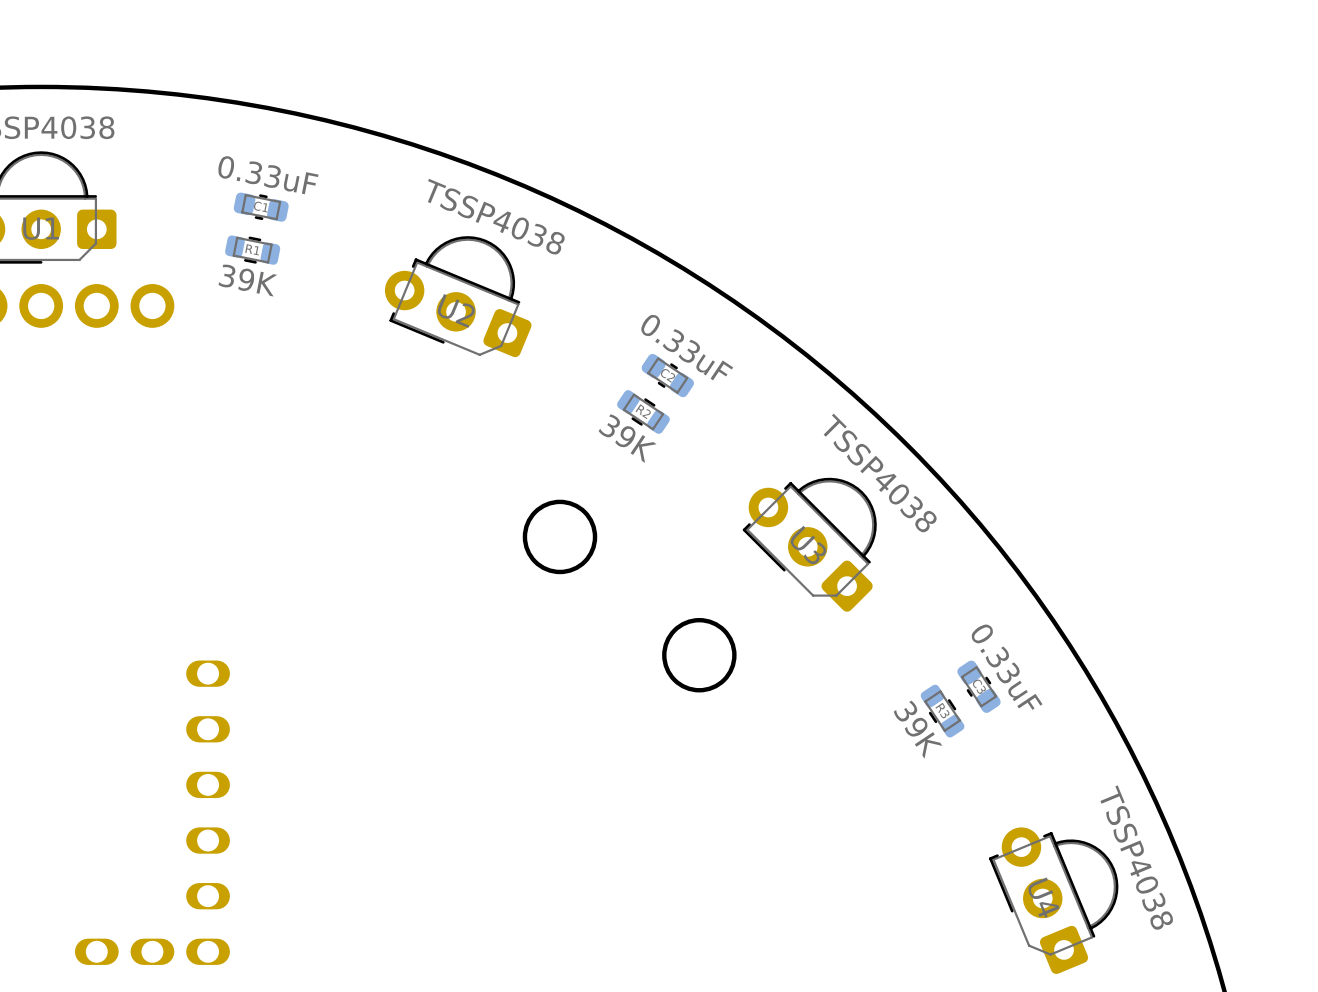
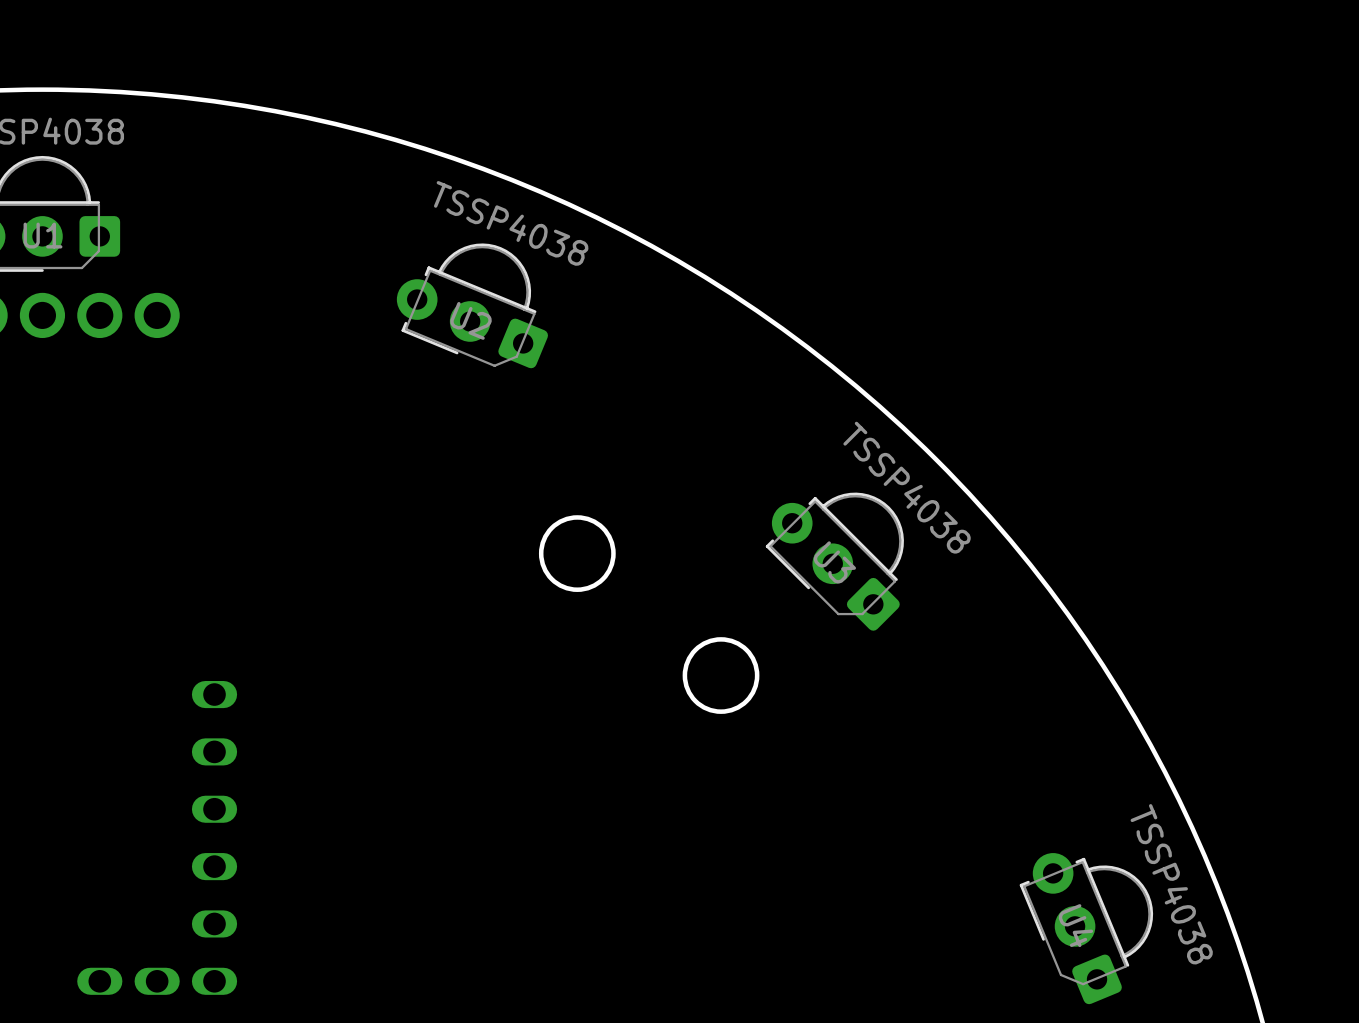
C1: 0.33uF (261, 207) -> none
R1: 39K (252, 250) -> none
C2: 0.33uF (667, 375) -> none
R2: 39K (643, 411) -> none
C3: 0.33uF (978, 686) -> none
R3: 39K (942, 711) -> none

